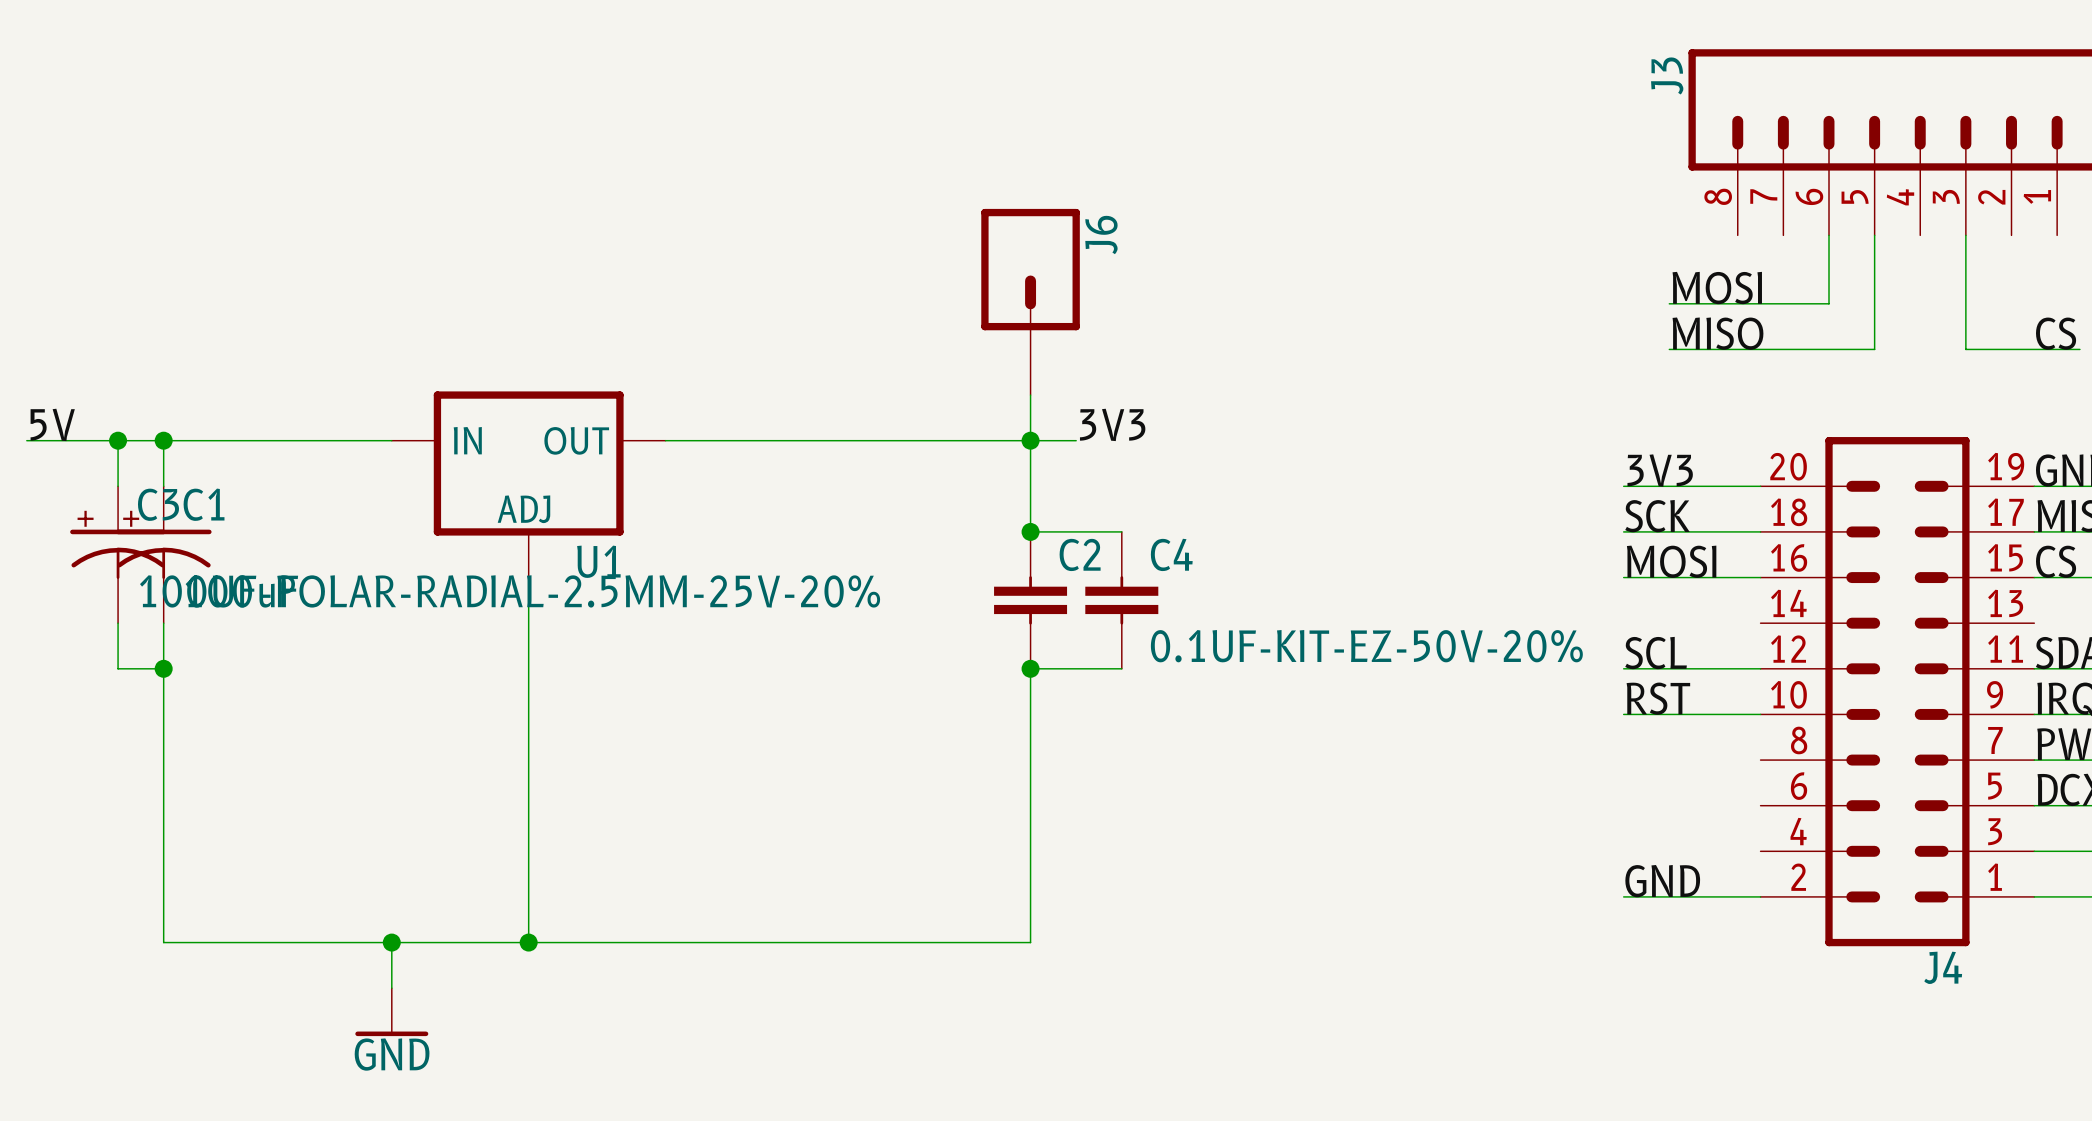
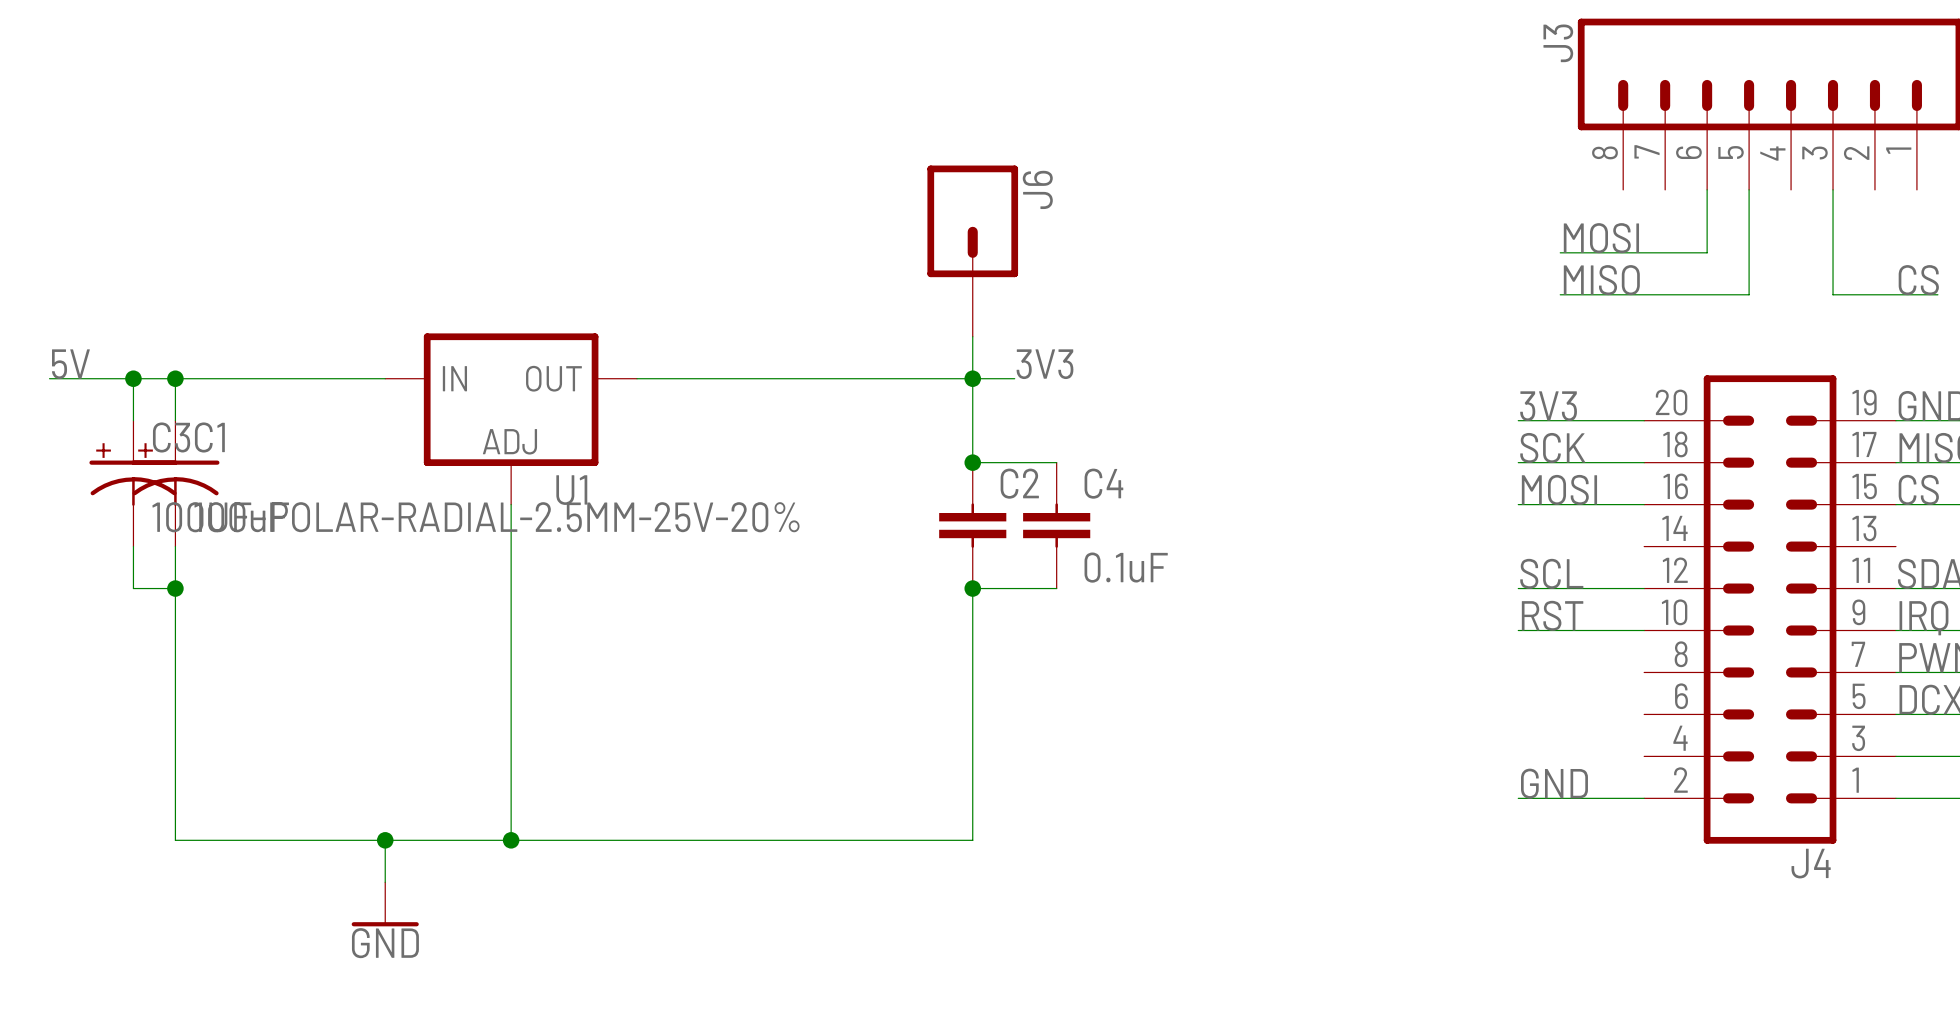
C4 value: 0.1UF-KIT-EZ-50V-20% (1366, 646) -> 0.1uF (1126, 567)

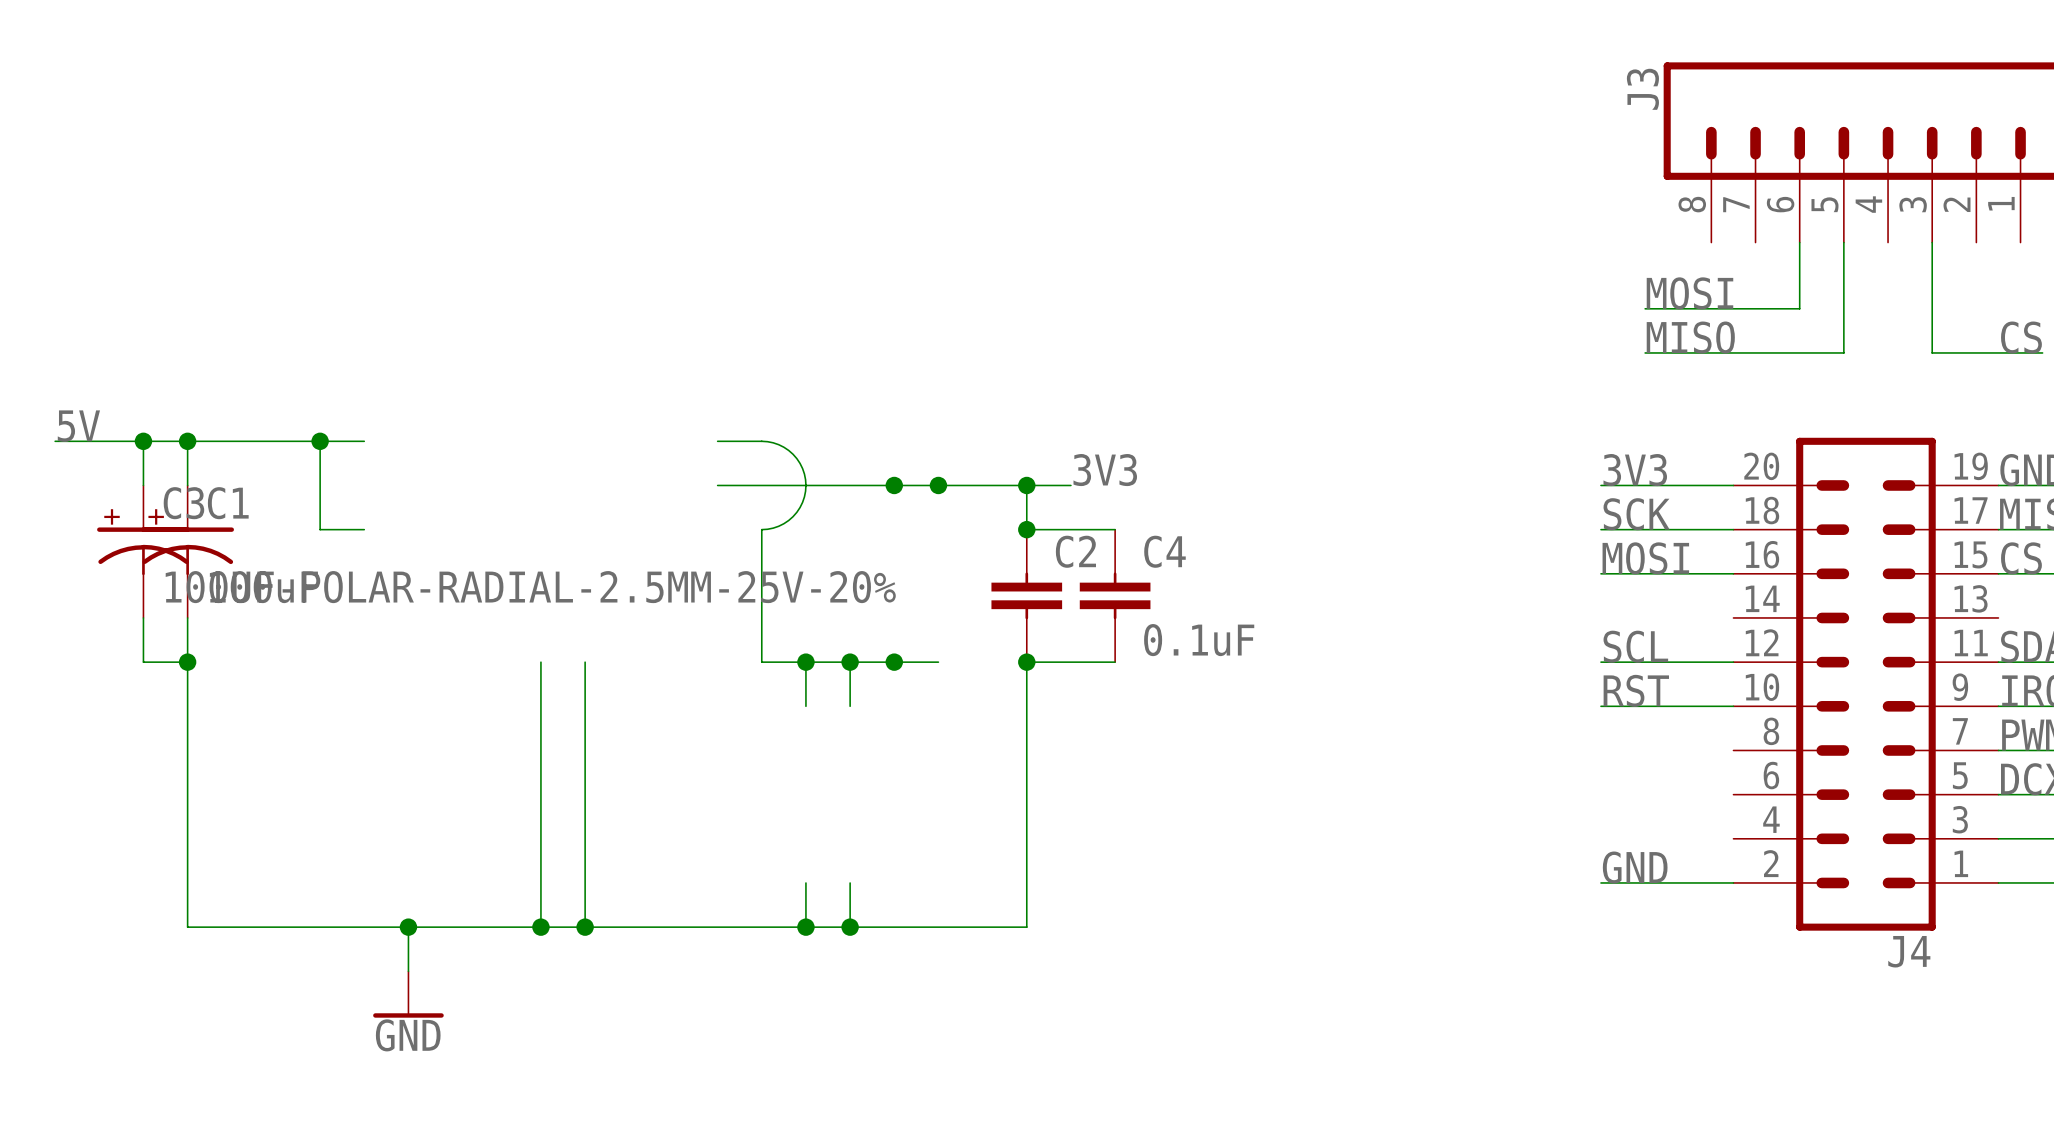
J6: (972, 251) -> none
wire: (972, 336) (972, 420) -> none
label position: 3V3 (1044, 364) -> 3V3 (1105, 470)
wire: none -> (320, 441) (320, 529) (364, 529)
junction: none -> (320, 441)
wire: (343, 378) (385, 378) -> none
wire: (637, 378) (678, 378) -> none
wire: (720, 378) (1014, 378) -> (761, 441) (778, 444) (793, 454) (802, 468) (805, 485) (802, 502) (793, 516) (778, 526) (761, 529) (761, 662) (938, 662)
junction position: (972, 378) -> (1026, 485)
U1: (511, 419) -> none
wire: none -> (717, 485) (1070, 485)
junction: none -> (894, 485)
junction: none -> (938, 485)
wire: (511, 504) (511, 588) -> none
wire: none -> (585, 662) (585, 927)
wire: none -> (805, 662) (805, 706)
junction: none -> (805, 662)
wire: none -> (850, 662) (850, 706)
junction: none -> (850, 662)
junction: none -> (894, 662)
wire: none -> (805, 882) (805, 927)
wire: none -> (850, 882) (850, 927)
junction: none -> (585, 927)
junction: none -> (805, 927)
junction: none -> (850, 927)

